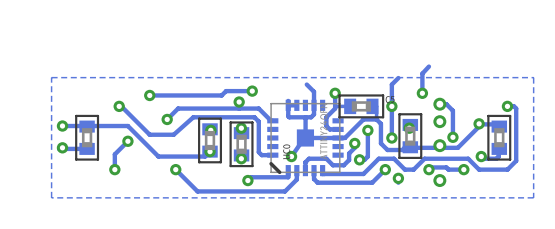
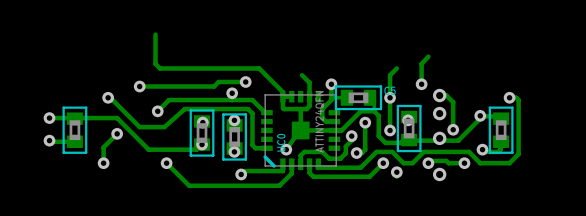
track: none -> (155, 34) (155, 63) (160, 68) (259, 68) (282, 92)
zone outline: (533, 77) (533, 197) (51, 197) (51, 77) (533, 77) -> none

